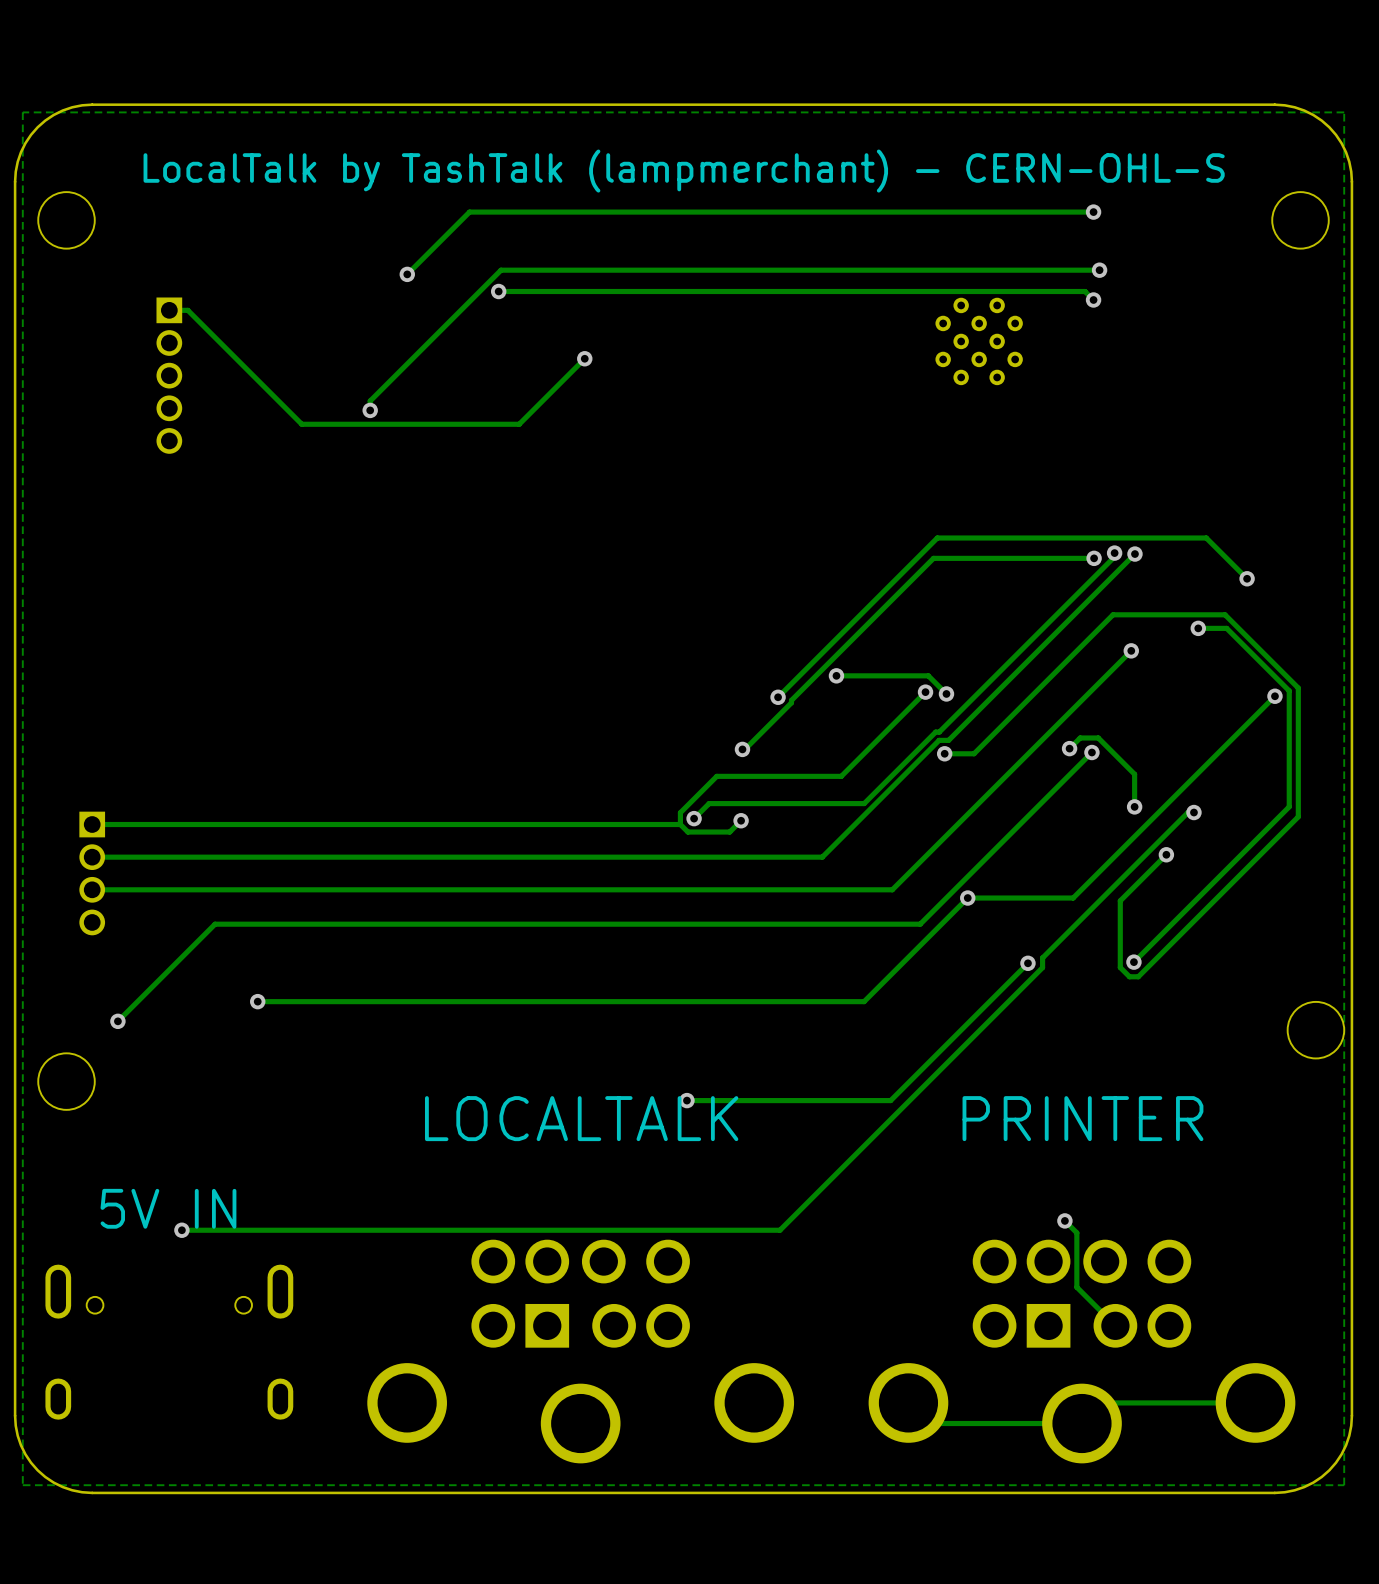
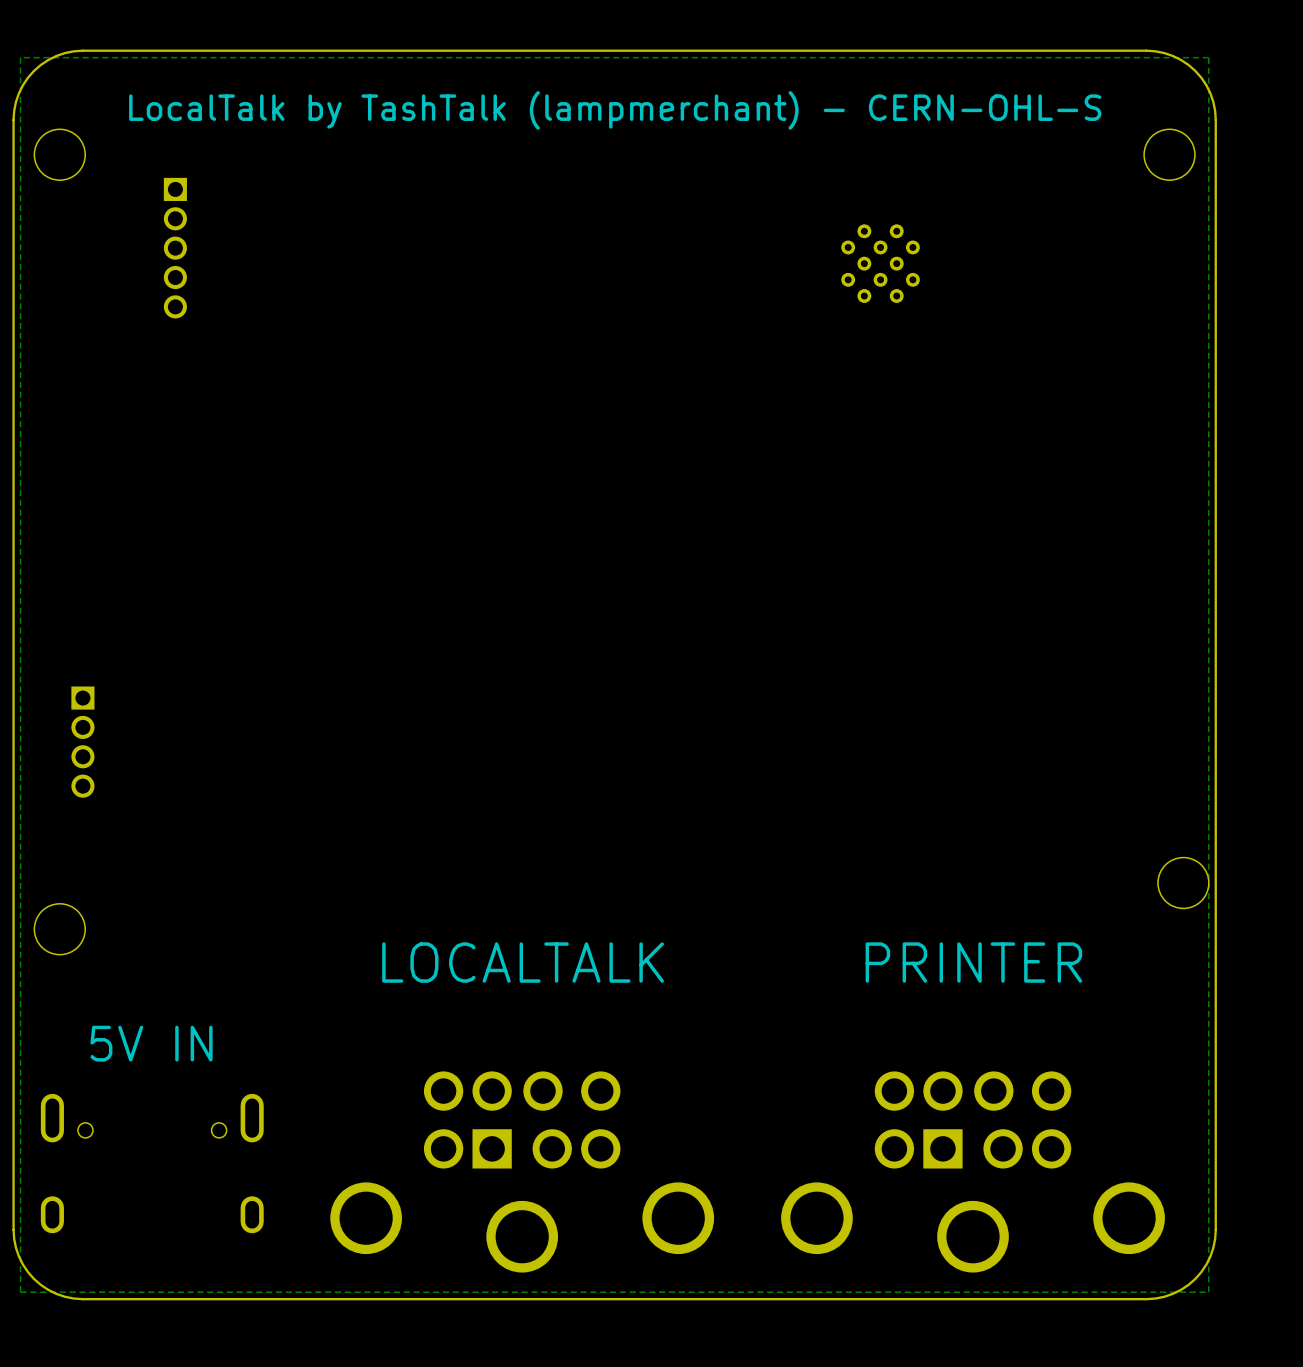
track: (1093, 212) (469, 212) (407, 274) -> none
via: (1093, 212) -> none
track: (1099, 270) (501, 270) (370, 401) (370, 410) -> none
via: (1099, 270) -> none
via: (407, 274) -> none
track: (498, 291) (1085, 291) (1093, 299) -> none
via: (498, 291) -> none
via: (1093, 299) -> none
track: (169, 310) (187, 310) (301, 424) (519, 424) (584, 358) -> none
via: (584, 358) -> none
part position: (169, 375) -> (175, 248)
via: (370, 410) -> none
track: (1114, 553) (1114, 556) (939, 732) (935, 732) (864, 803) (709, 803) (694, 818) -> none
via: (1114, 553) -> none
track: (1134, 554) (948, 740) (939, 740) (822, 857) (92, 857) -> none
via: (1134, 554) -> none
track: (1094, 558) (933, 558) (791, 700) (791, 702) (744, 749) (742, 749) -> none
via: (1094, 558) -> none
track: (1247, 578) (1206, 538) (937, 538) (778, 697) -> none
via: (1247, 578) -> none
track: (1198, 628) (1226, 628) (1289, 690) (1289, 806) (1133, 962) -> none
via: (1198, 628) -> none
track: (1131, 650) (892, 889) (92, 889) -> none
via: (1131, 650) -> none
track: (836, 675) (928, 675) (946, 693) -> none
via: (836, 675) -> none
track: (925, 692) (841, 776) (716, 776) (680, 812) (680, 824) -> none
via: (925, 692) -> none
via: (946, 693) -> none
track: (1274, 696) (1073, 898) (967, 898) (864, 1001) (257, 1001) -> none
via: (1274, 696) -> none
via: (778, 697) -> none
track: (1069, 748) (1080, 737) (1098, 737) (1134, 774) (1134, 806) -> none
via: (1069, 748) -> none
via: (742, 749) -> none
track: (1091, 752) (920, 924) (215, 924) (117, 1021) -> none
via: (1091, 752) -> none
track: (944, 753) (974, 753) (1113, 614) (1225, 614) (1298, 688) (1298, 816) (1138, 976) (1129, 976) (1120, 967) (1120, 900) (1166, 854) -> none
via: (944, 753) -> none
via: (1134, 806) -> none
track: (1193, 812) (1188, 812) (1042, 957) (1042, 967) (779, 1230) (181, 1230) -> none
via: (1193, 812) -> none
via: (694, 818) -> none
track: (741, 820) (729, 832) (687, 832) (680, 824) -> none
via: (741, 820) -> none
track: (680, 824) (92, 824) -> none
via: (1166, 854) -> none
via: (967, 898) -> none
via: (1133, 962) -> none
track: (1027, 963) (890, 1100) (686, 1100) -> none
via: (1027, 963) -> none
via: (257, 1001) -> none
via: (117, 1021) -> none
via: (686, 1100) -> none
track: (1064, 1220) (1076, 1232) (1076, 1287) (1115, 1325) -> none
via: (1064, 1220) -> none
via: (181, 1230) -> none
track: (1255, 1402) (1102, 1402) (1081, 1423) (929, 1423) (908, 1402) -> none

